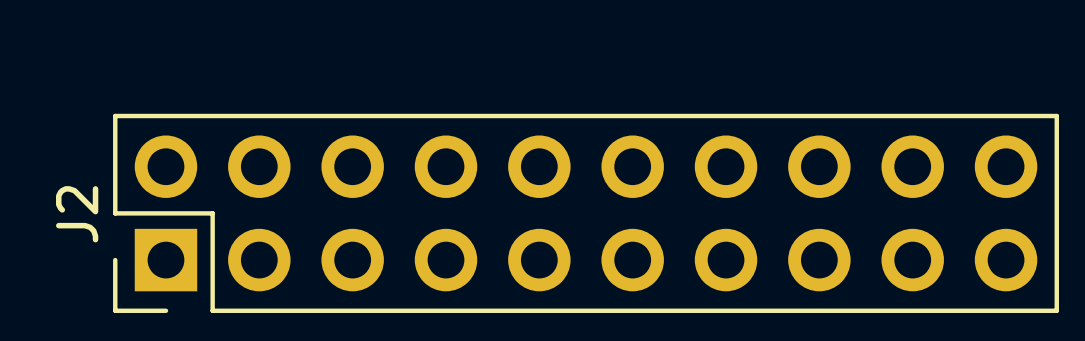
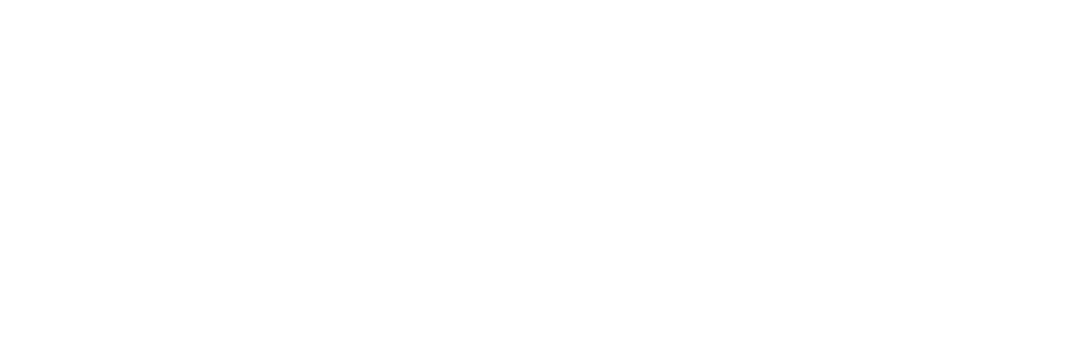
J2: (586, 213) -> none

